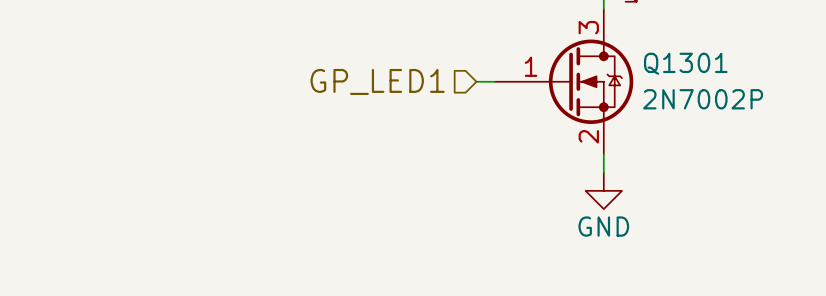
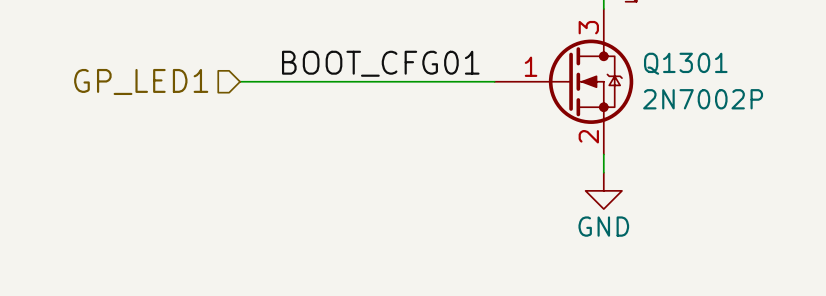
label: none -> BOOT_CFG01 (380, 63)
wire: none -> (240, 81) (476, 81)
hierarchical label position: GP_LED1 (377, 81) -> GP_LED1 (141, 81)

